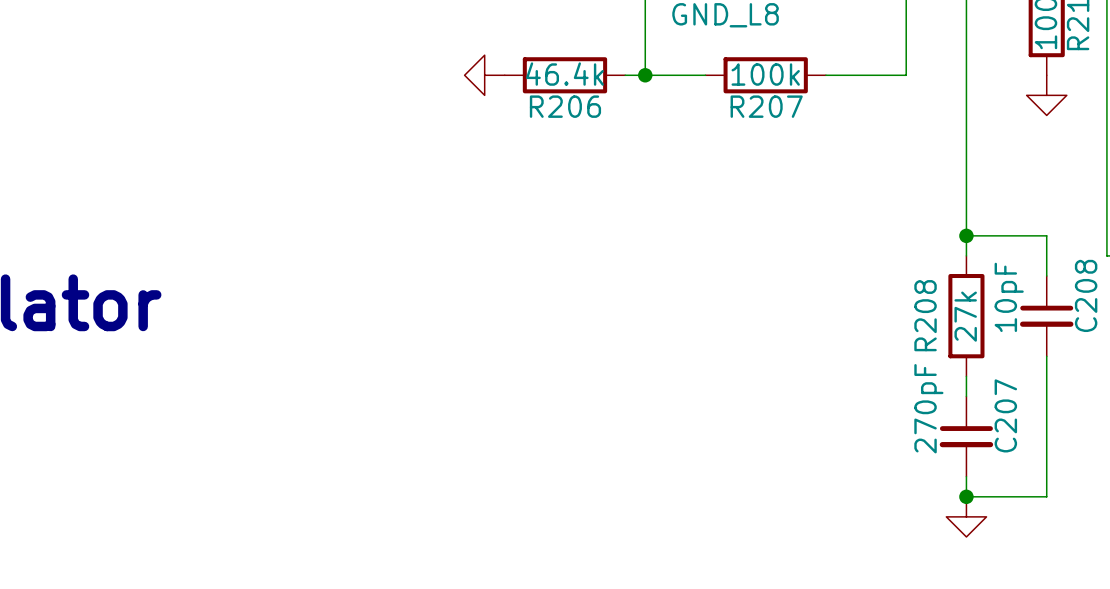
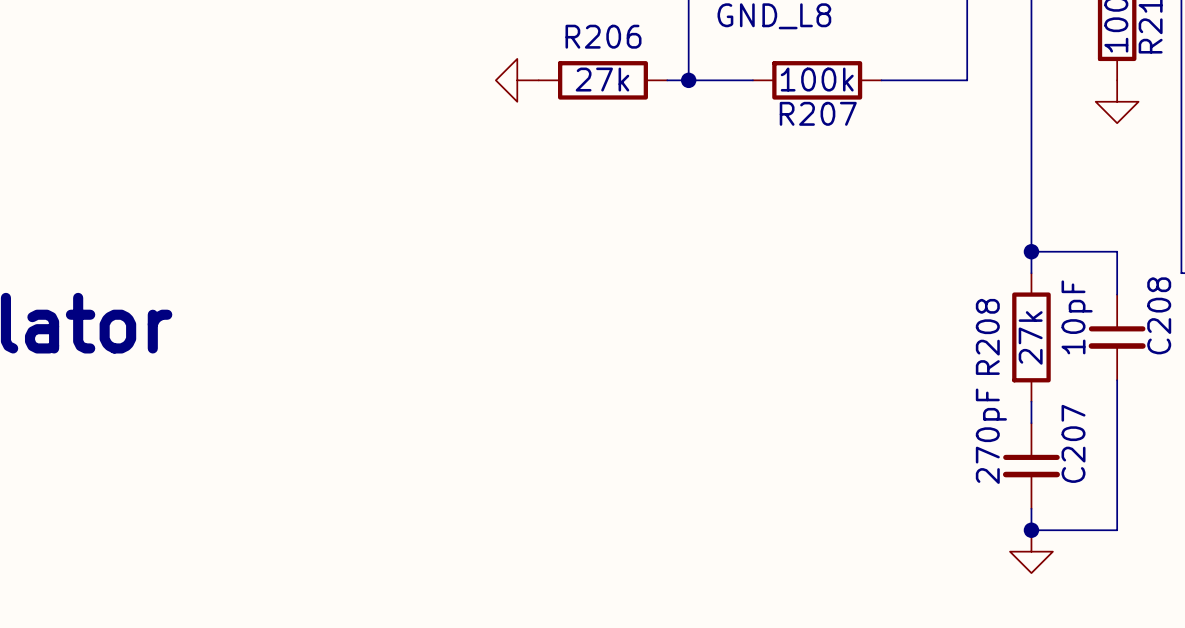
R206 value: 46.4k (564, 74) -> 27k (602, 79)
R206 name position: R206 (565, 106) -> R206 (603, 36)

